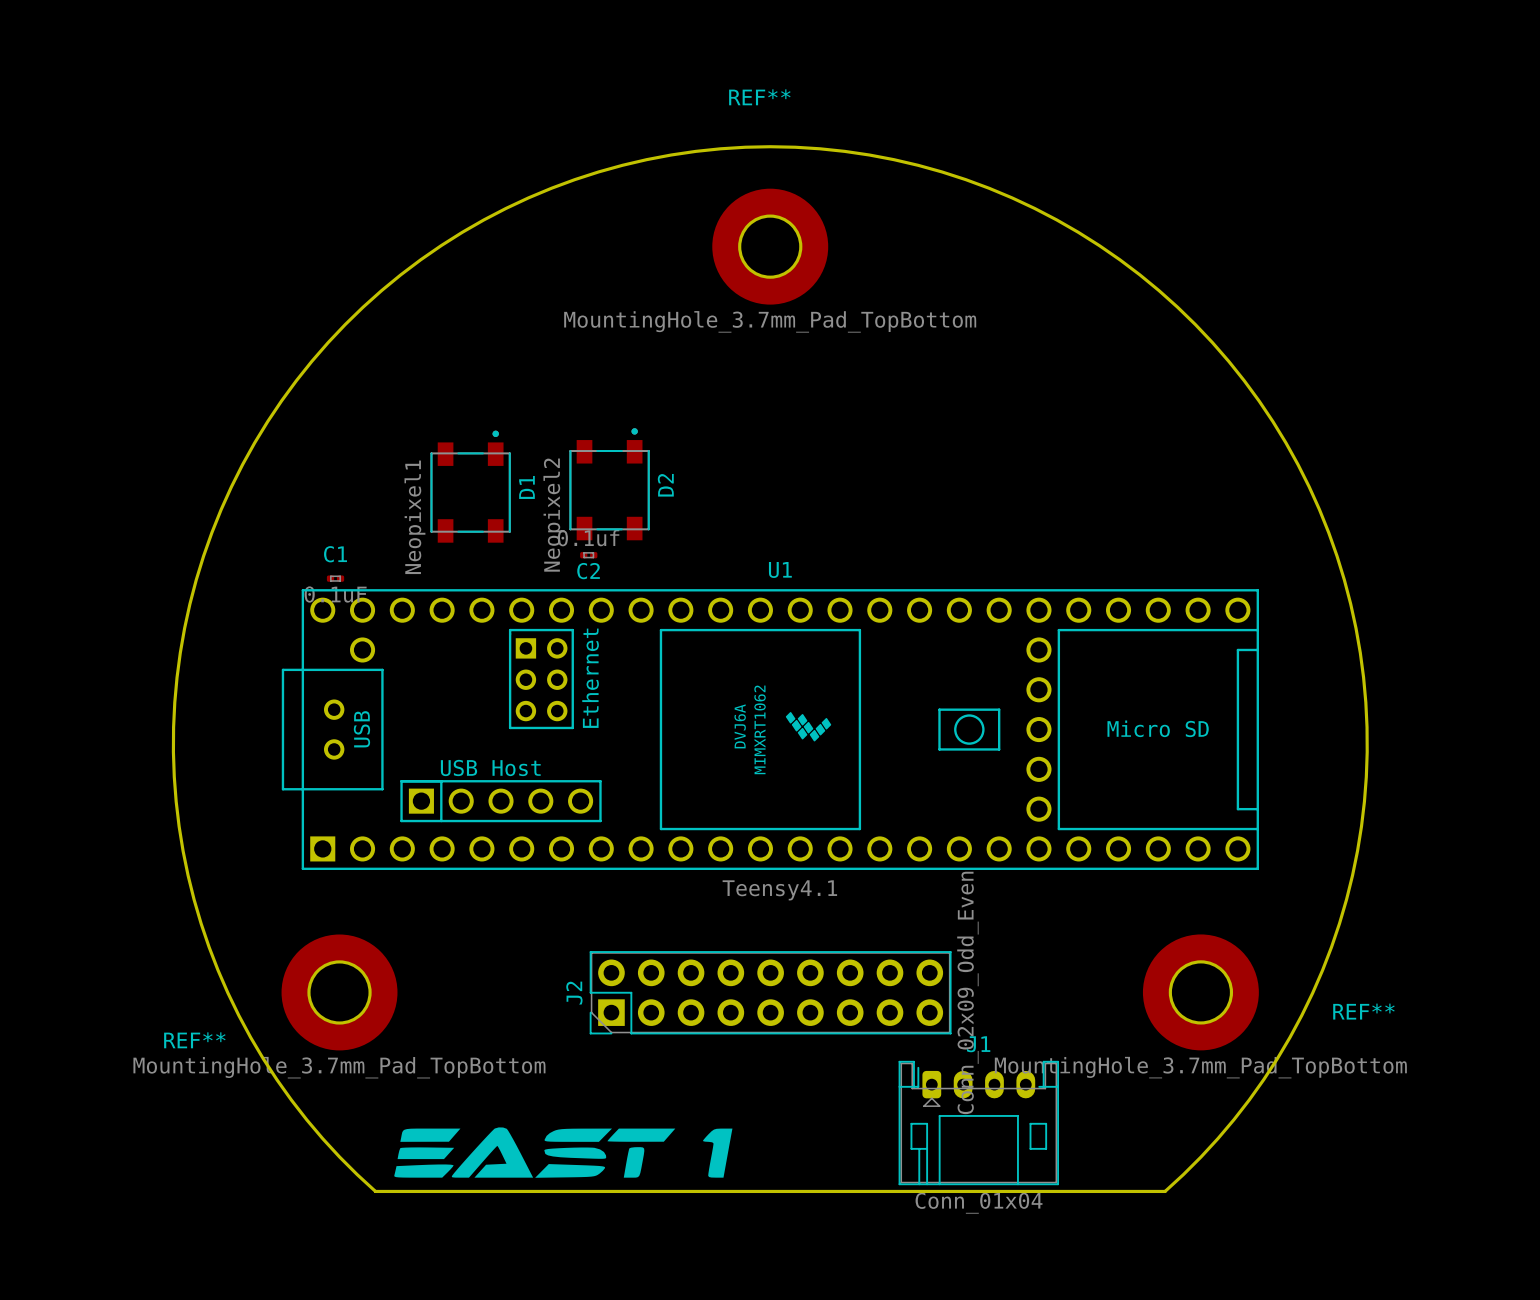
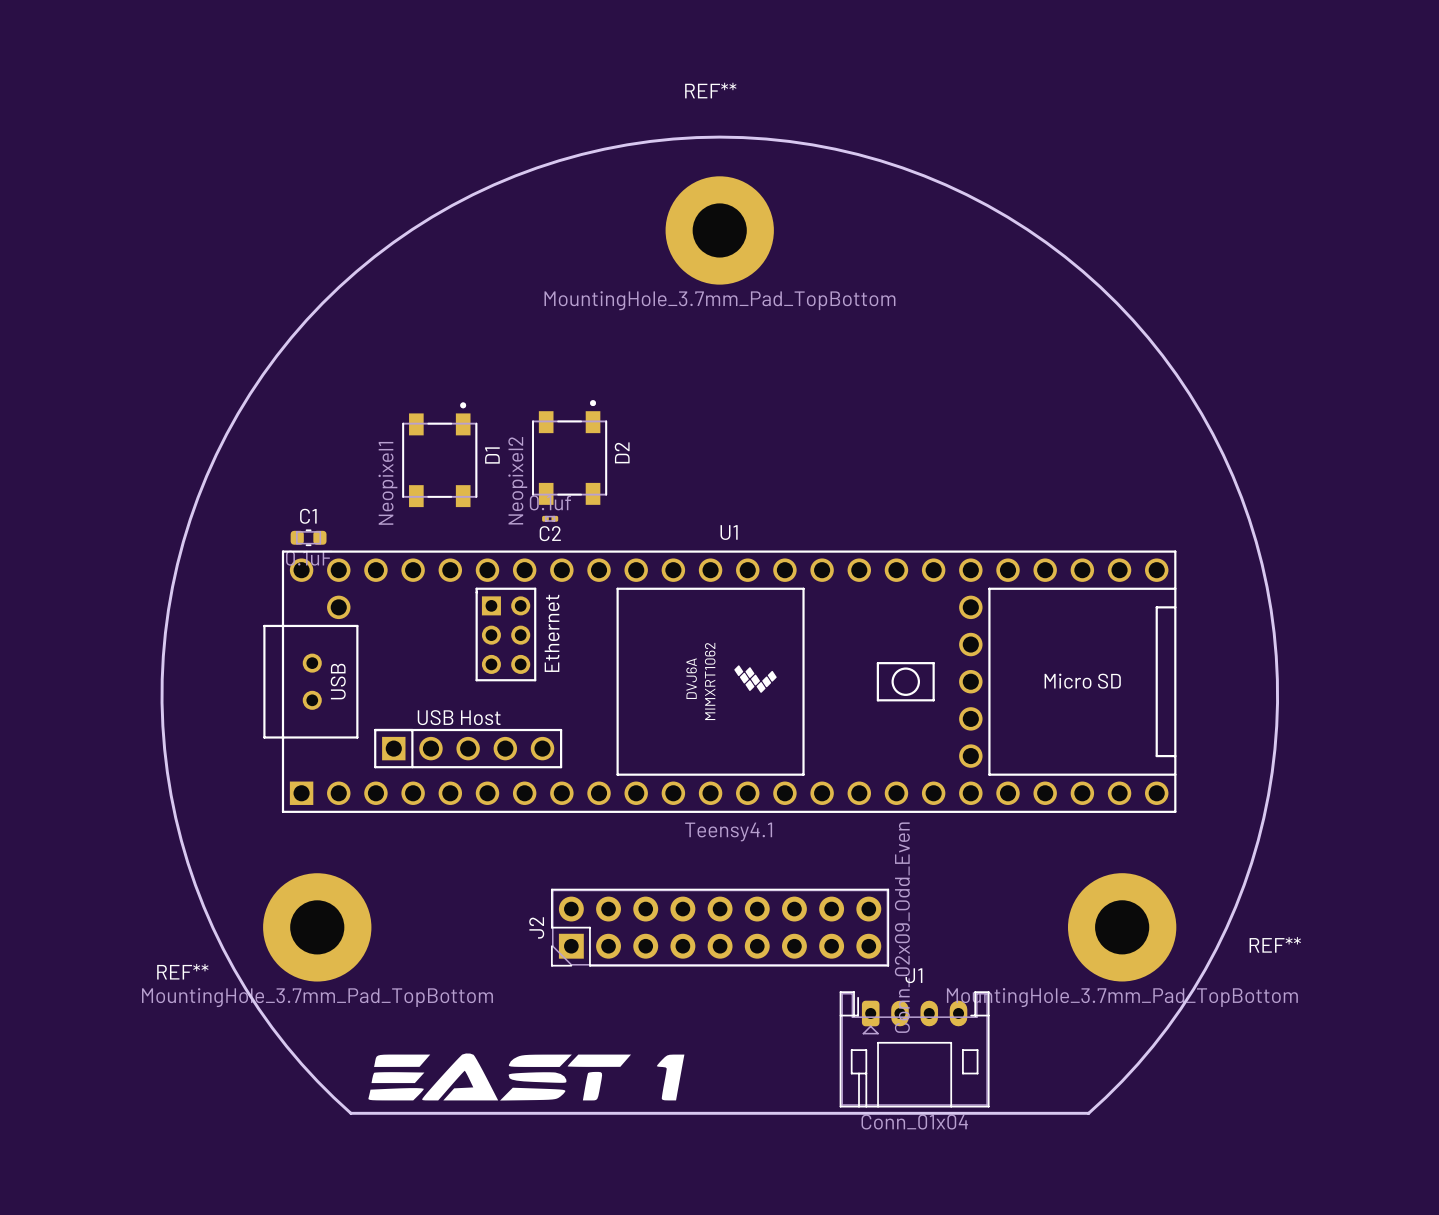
C1 footprint: [326, 575, 345, 582] -> [290, 529, 327, 547]

